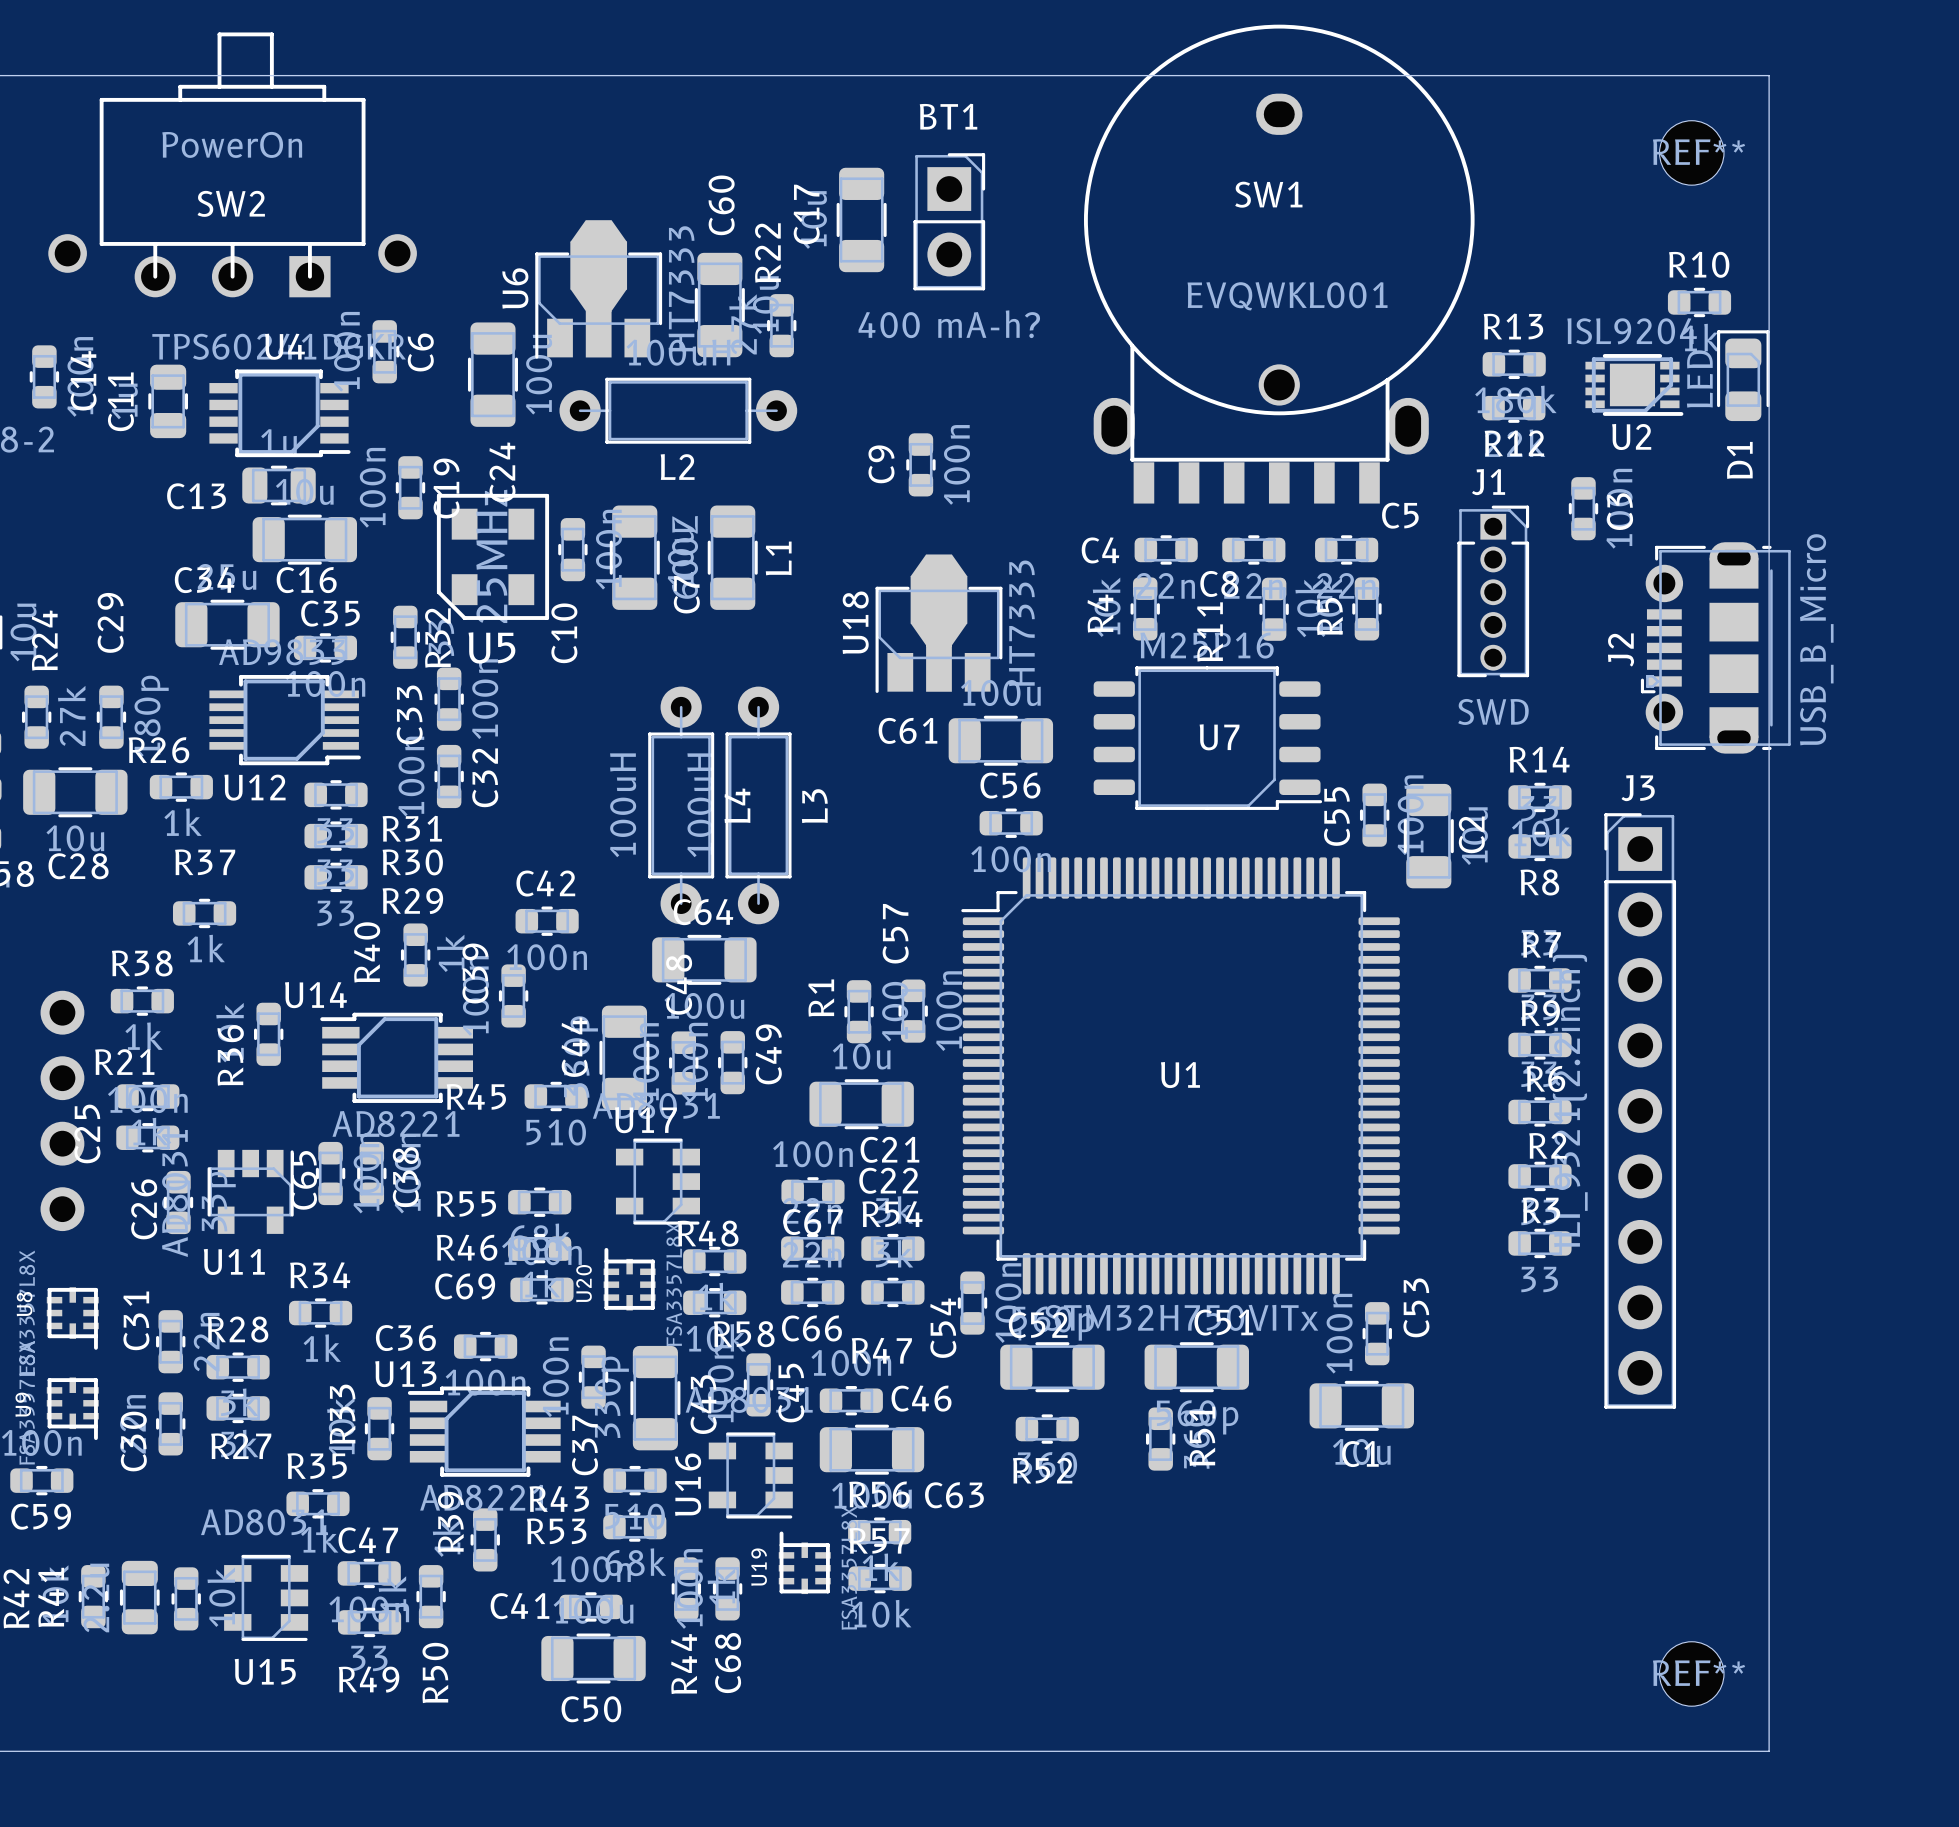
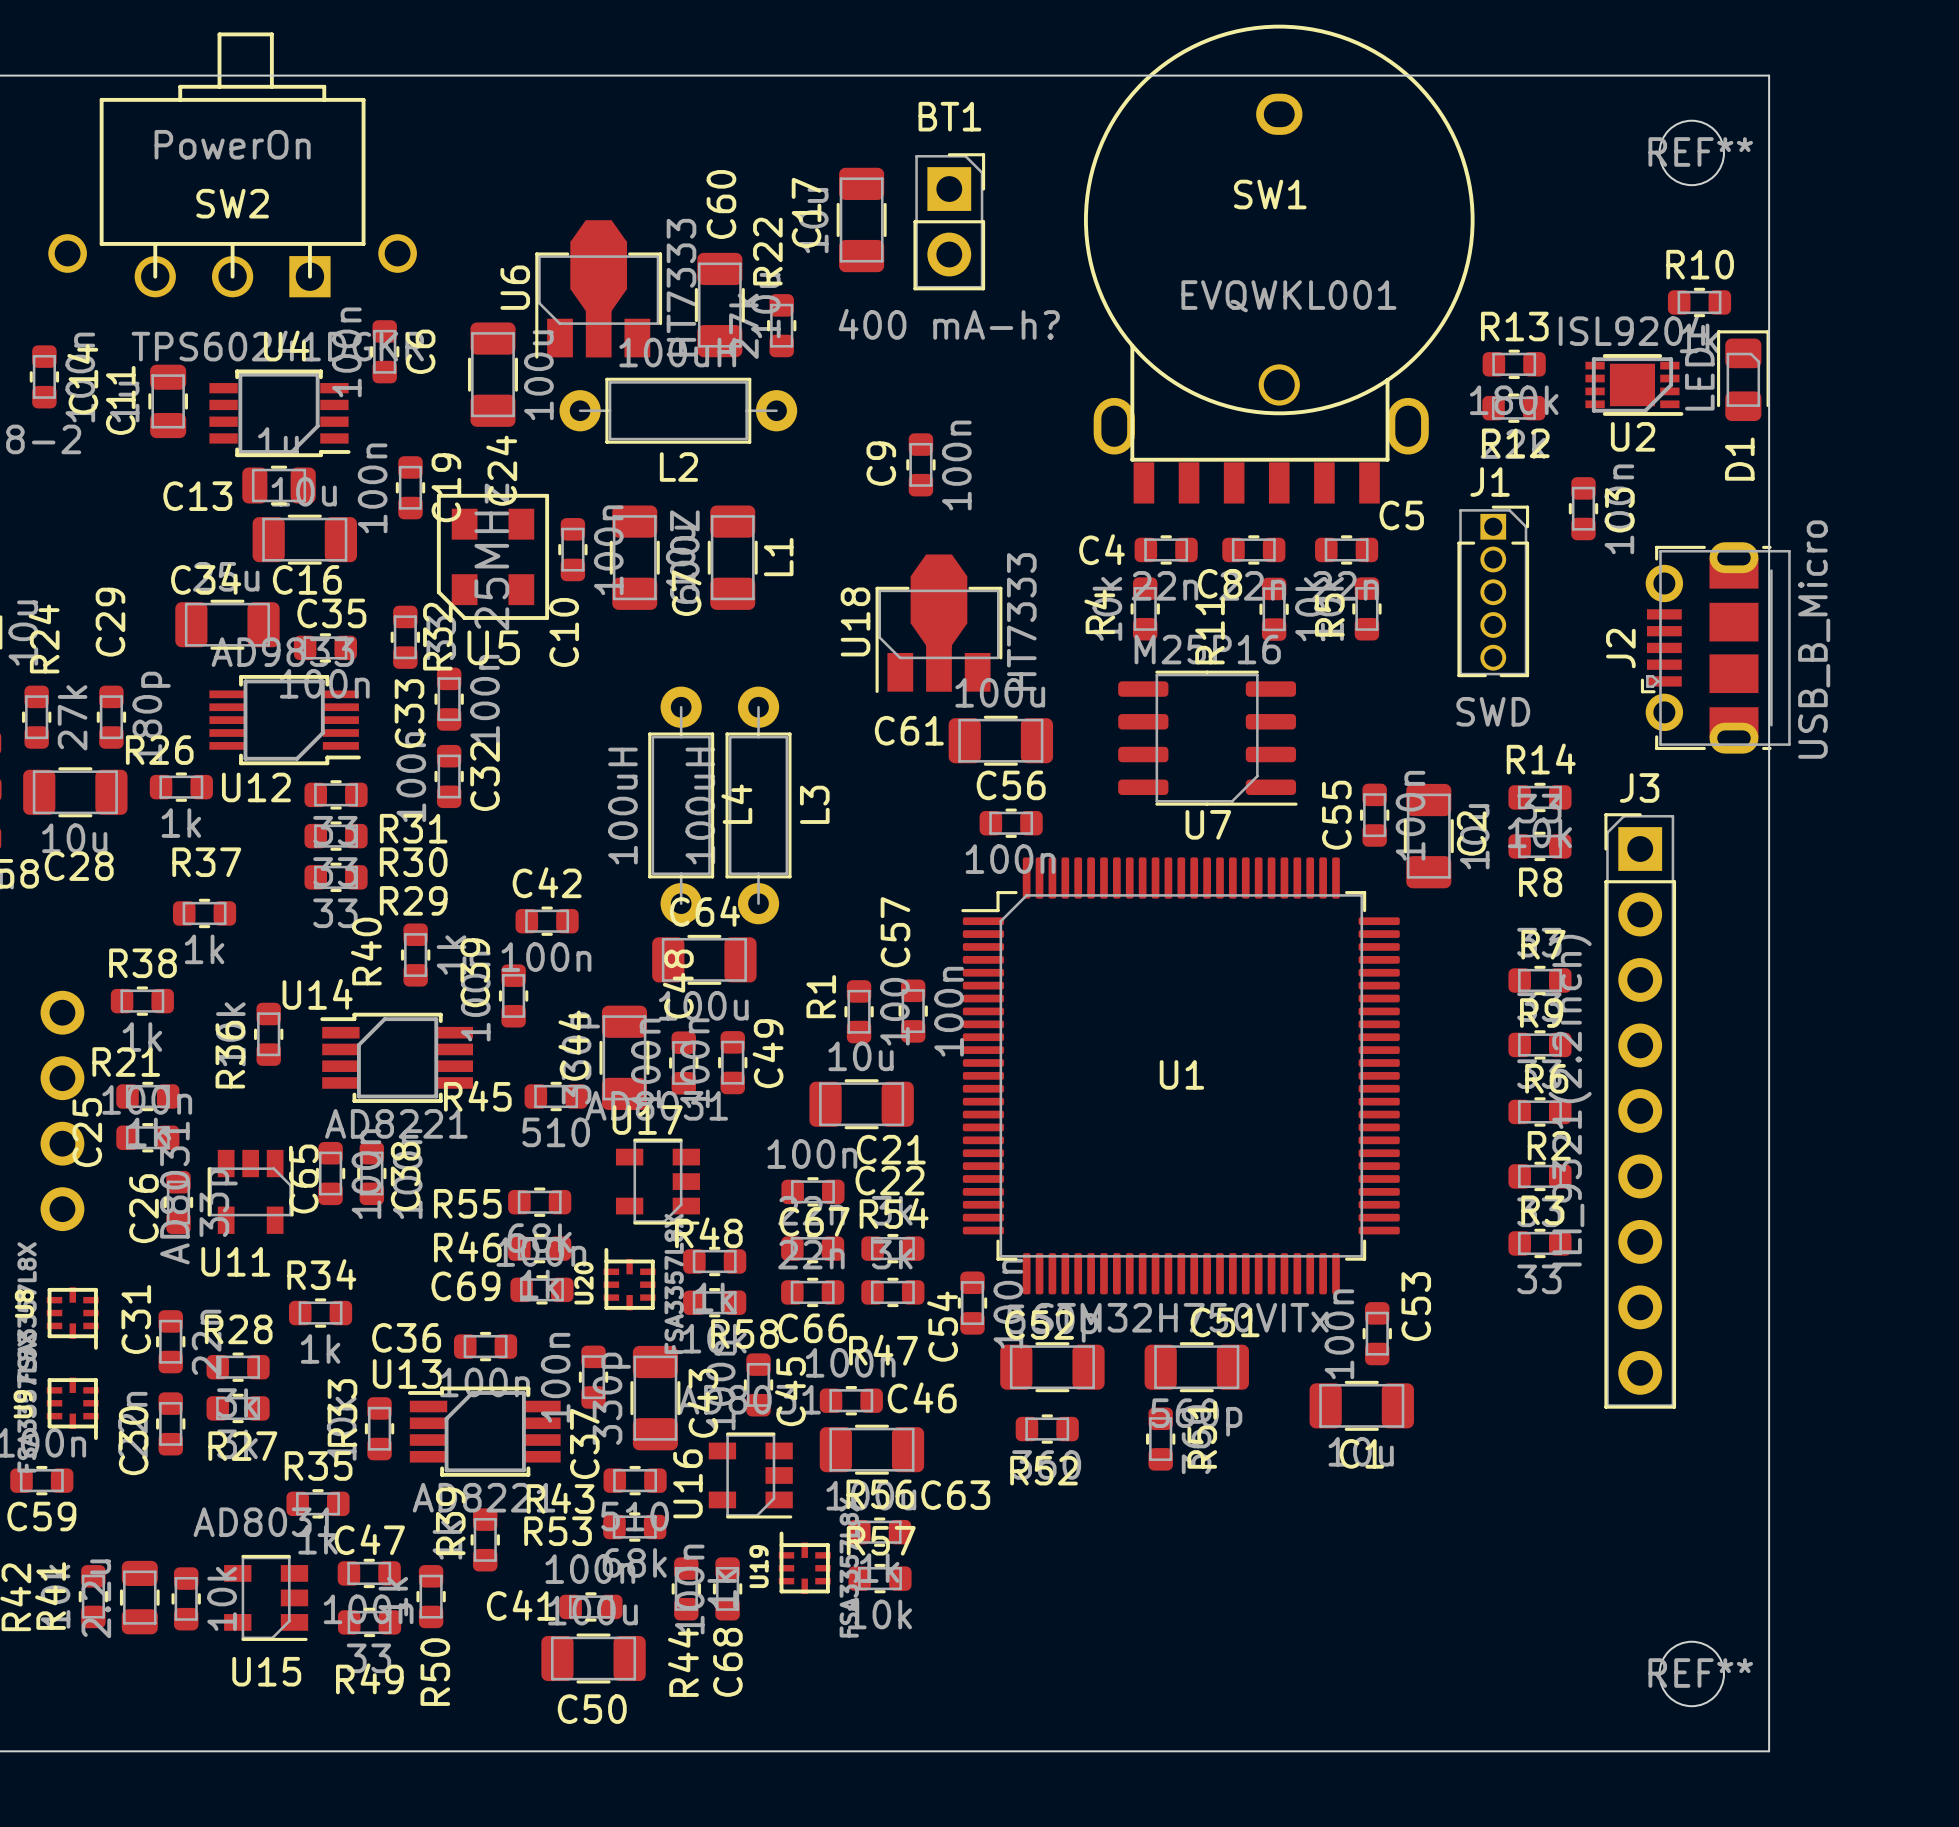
U7 footprint: [1093, 666, 1323, 810] -> [1118, 670, 1298, 806]
U7 name position: U7 (1219, 737) -> U7 (1208, 824)

